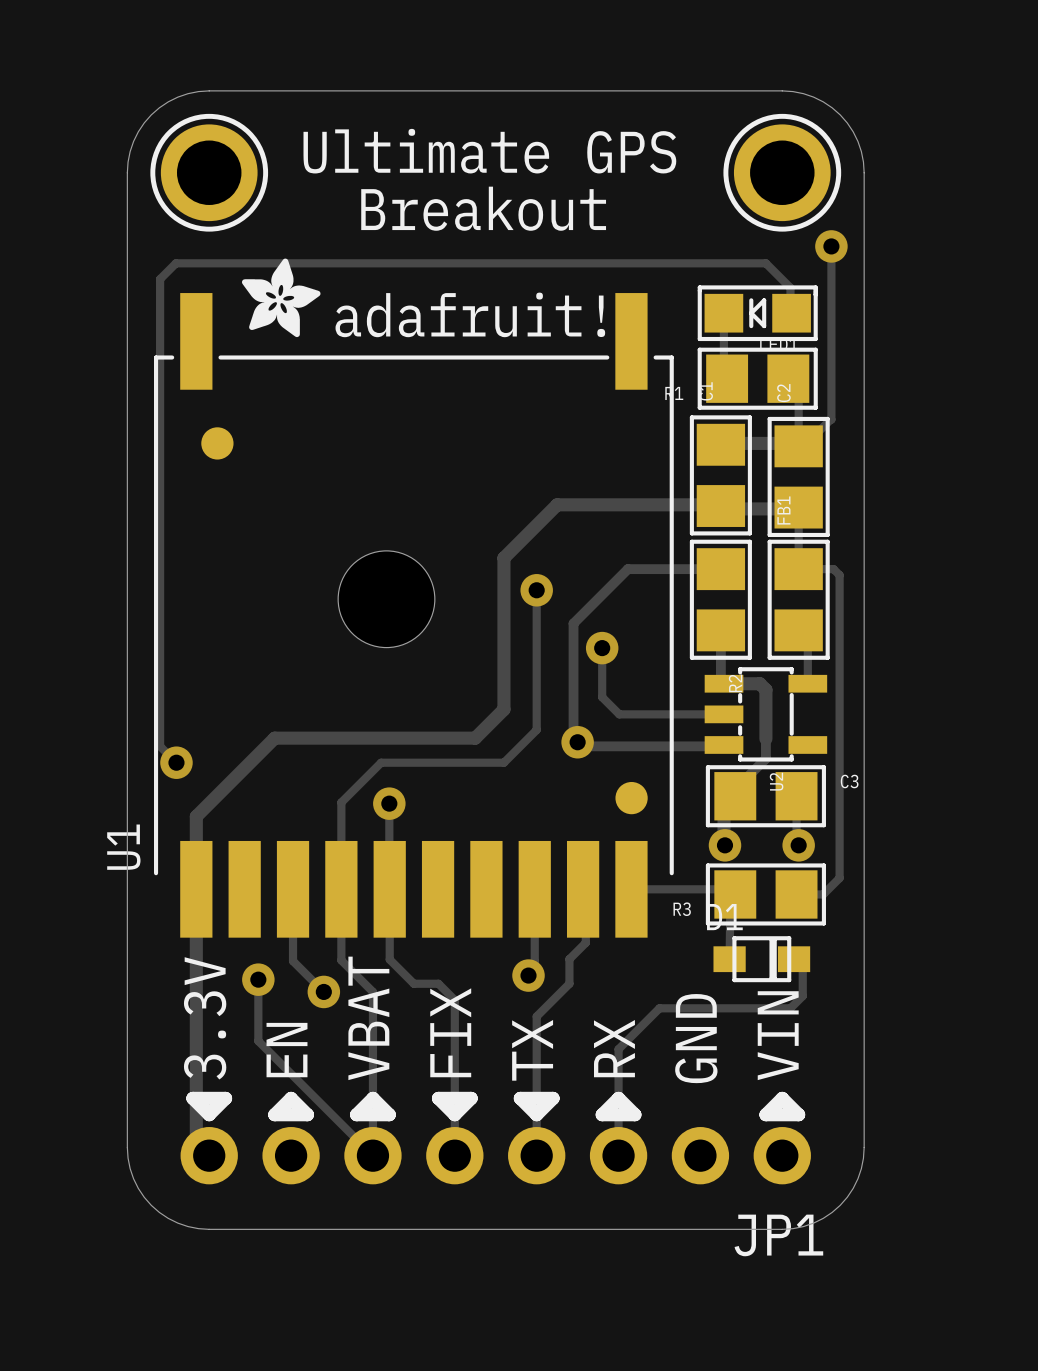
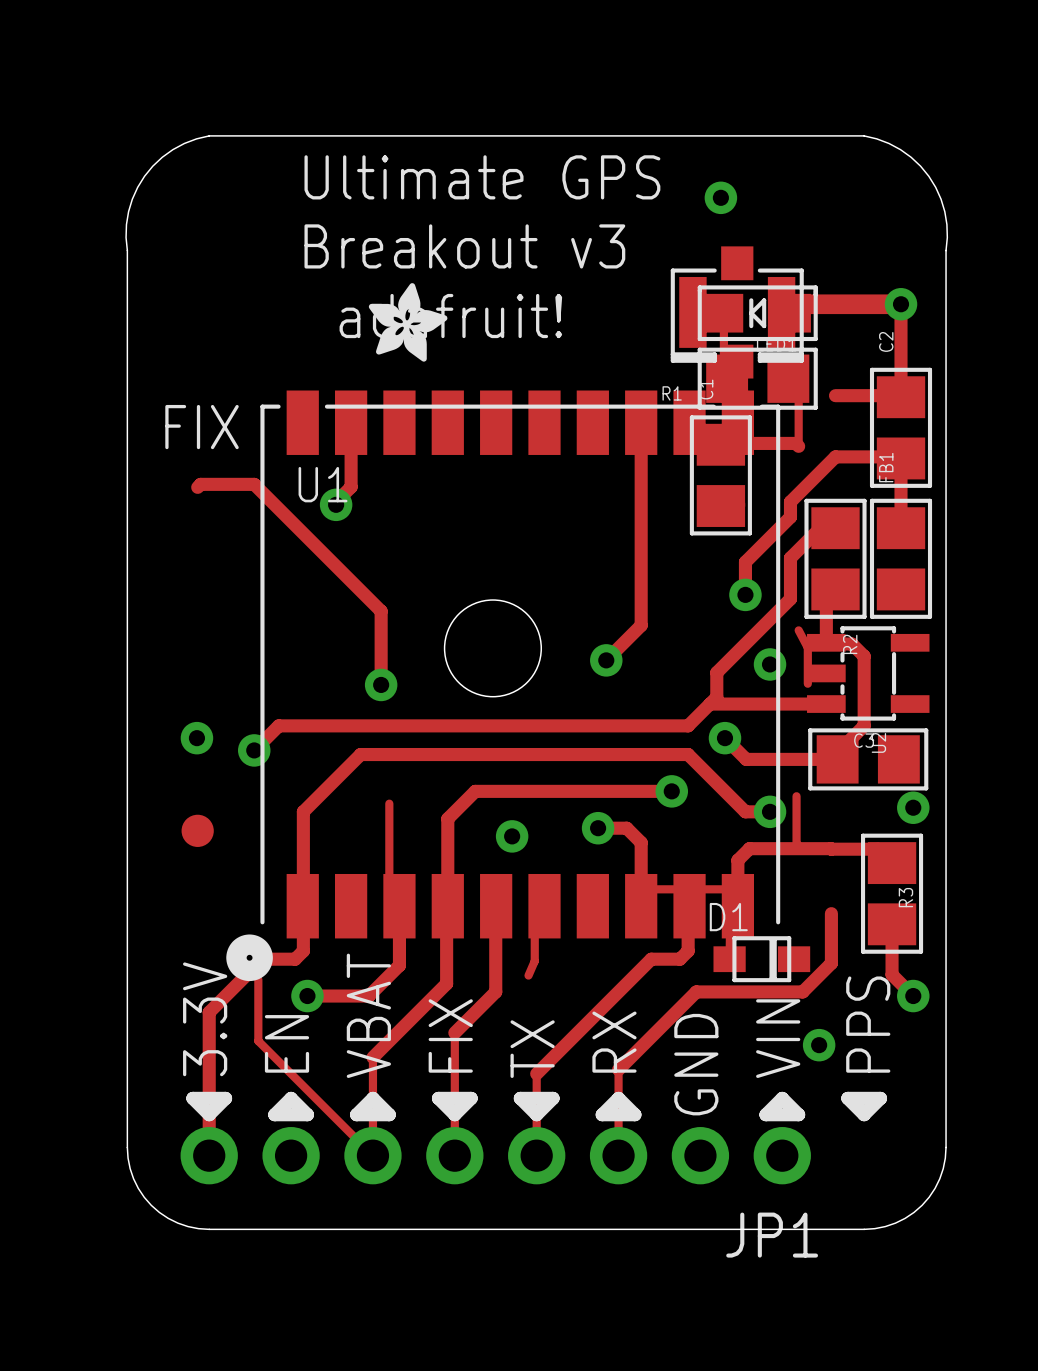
text position: Ultimate GPS (489, 151) -> Ultimate GPS (482, 177)
part: (209, 172) -> none
part: (782, 172) -> none
via: none -> (720, 197)
text: Breakout (483, 208) -> Breakout v3 (464, 246)
track: (831, 246) (831, 419) (815, 435) (809, 435) (798, 446) (804, 446) -> none
via: (831, 246) -> none
board edge: (127, 250) (127, 172) (133, 141) (144, 122) (159, 107) (177, 97) (198, 91) (782, 90) (813, 97) (832, 107) (847, 122) (861, 151) (864, 172) (864, 1147) (857, 1178) (840, 1205) (813, 1223) (782, 1229) -> (127, 250) (126, 224) (128, 211) (137, 187) (144, 176) (152, 166) (172, 149) (184, 143) (209, 135) (864, 135) (889, 143) (900, 149) (920, 166) (928, 176) (935, 187) (944, 211) (947, 237) (945, 1158) (939, 1178) (929, 1197) (914, 1212) (895, 1223) (864, 1229) (782, 1229)
U1 footprint: [153, 293, 674, 938] -> [226, 390, 781, 982]
drawing position: (281, 297) -> (408, 322)
via: none -> (901, 304)
part: none -> (737, 312)
track: none -> (781, 312) (789, 304) (901, 304) (901, 397) (899, 395) (835, 395)
track: (791, 313) (790, 287) (765, 263) (175, 263) (160, 279) (160, 746) (176, 762) -> none
track: none -> (351, 422) (351, 487) (336, 502) (336, 504)
track: none -> (641, 422) (641, 625) (606, 660)
text: none -> FIX (202, 427)
part: (217, 443) -> none
C2 position: (798, 476) -> (901, 427)
track: none -> (197, 487) (200, 484) (254, 484) (381, 611) (381, 684)
via: none -> (336, 504)
track: (798, 508) (798, 569) (833, 569) (839, 575) (839, 878) (823, 894) (796, 894) -> none
track: (798, 508) (723, 508) (720, 504) (557, 504) (503, 558) (503, 709) (475, 738) (274, 738) (196, 816) (196, 1142) (209, 1155) -> none
track: none -> (835, 528) (819, 529) (790, 558) (790, 598) (716, 672) (716, 697) (688, 725) (278, 725) (254, 750)
track: none -> (901, 528) (901, 458) (899, 456) (835, 456) (790, 501) (790, 517) (745, 562) (745, 594)
track: (720, 569) (627, 569) (573, 623) (573, 738) (577, 742) (577, 746) (724, 744) -> none
track: none -> (835, 589) (826, 598) (826, 642) (851, 644) (864, 656) (864, 725) (837, 752) (837, 759) (746, 759) (724, 738)
track: (536, 590) (536, 729) (503, 762) (381, 762) (341, 802) (341, 960) (372, 991) (372, 1057) -> (671, 791) (475, 791) (447, 818) (446, 983) (372, 1057)
via: (536, 590) -> none
via: none -> (745, 594)
R2 position: (720, 599) -> (835, 558)
FB1 position: (798, 599) -> (901, 558)
track: (720, 627) (720, 680) (724, 683) (759, 683) (765, 689) (765, 758) (735, 789) (735, 796) (724, 801) (724, 845) -> none
track: (602, 648) (602, 697) (619, 714) (724, 714) -> none
via position: (602, 648) -> (606, 660)
via: none -> (770, 664)
via: none -> (381, 684)
track: none -> (709, 704) (826, 704)
U2 position: (765, 714) -> (868, 673)
via: none -> (724, 738)
via: (577, 742) -> none
via: none -> (254, 750)
via position: (176, 762) -> (196, 738)
C3 name position: C3 (849, 781) -> C3 (864, 740)
via: none -> (671, 791)
C3 position: (765, 796) -> (868, 759)
part: (631, 798) -> none
via: (389, 803) -> none
via: none -> (913, 807)
track: none -> (770, 811) (745, 811) (688, 754) (360, 754) (303, 811) (303, 951) (295, 959) (262, 959) (209, 1012) (209, 1163)
via: none -> (770, 811)
track: none -> (598, 828) (626, 828) (641, 842) (641, 906)
via: none -> (598, 828)
part: none -> (197, 830)
via: none -> (512, 836)
via: (724, 845) -> none
via: (798, 845) -> none
U1 name position: U1 (123, 847) -> U1 (323, 484)
track: none -> (892, 863) (878, 849) (749, 848) (737, 860) (737, 906)
track: (293, 889) (293, 961) (323, 991) -> none
track: (389, 889) (389, 959) (413, 983) (438, 983) (454, 1000) (454, 1032) -> (495, 906) (495, 991) (454, 1032)
track: (583, 889) (585, 892) (585, 942) (569, 959) (569, 983) (536, 1016) (536, 1073) -> (689, 906) (688, 951) (679, 959) (651, 959) (536, 1073)
R3 rotation: 0° (765, 894) -> 90° clockwise (892, 893)
R3 position: (765, 894) -> (892, 893)
track: none -> (399, 906) (399, 965) (368, 996) (307, 996)
R3 name position: R3 (682, 909) -> R3 (905, 897)
track: none -> (892, 924) (892, 974) (913, 996)
track: (794, 959) (802, 956) (802, 996) (790, 1008) (659, 1008) (618, 1049) (618, 1069) -> (831, 913) (831, 963) (802, 991) (696, 991) (618, 1069)
via: (528, 975) -> none
via: (258, 979) -> none
via position: (323, 991) -> (307, 996)
via: none -> (913, 996)
text: none -> PPS (868, 1024)
text position: GND (696, 1038) -> GND (696, 1064)
via: none -> (819, 1045)
line: none -> (847, 1098) (880, 1098) (864, 1114) (847, 1098)

